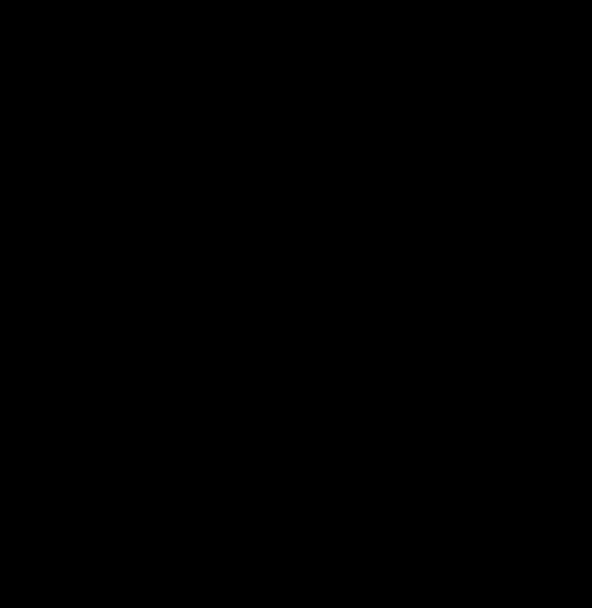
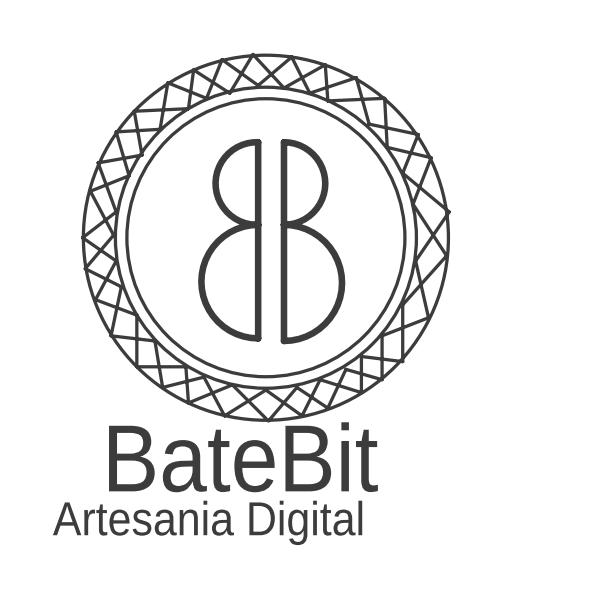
drawing: none -> [80, 52, 451, 423]

